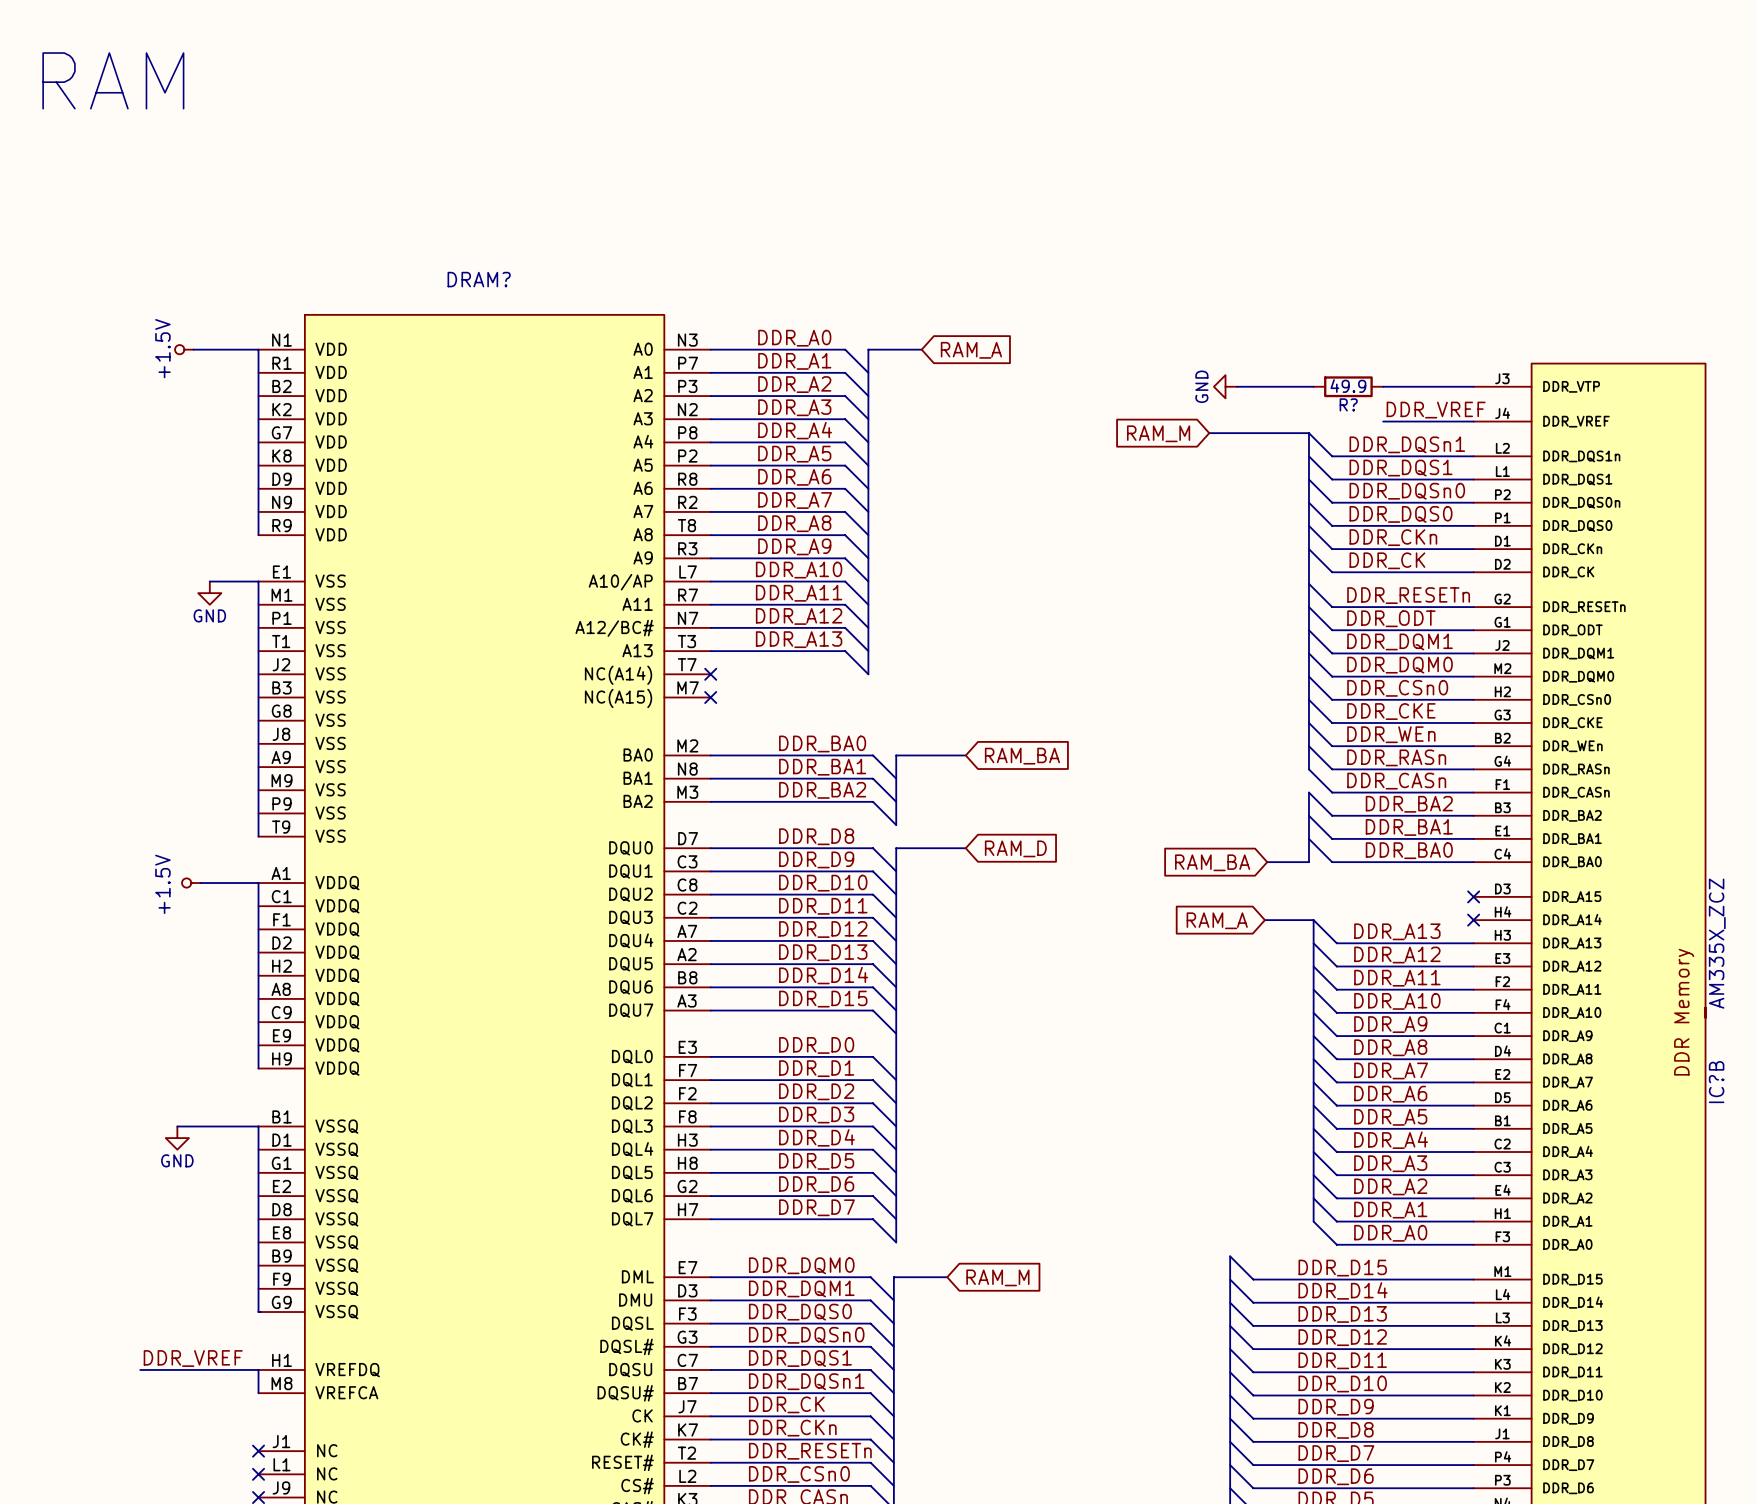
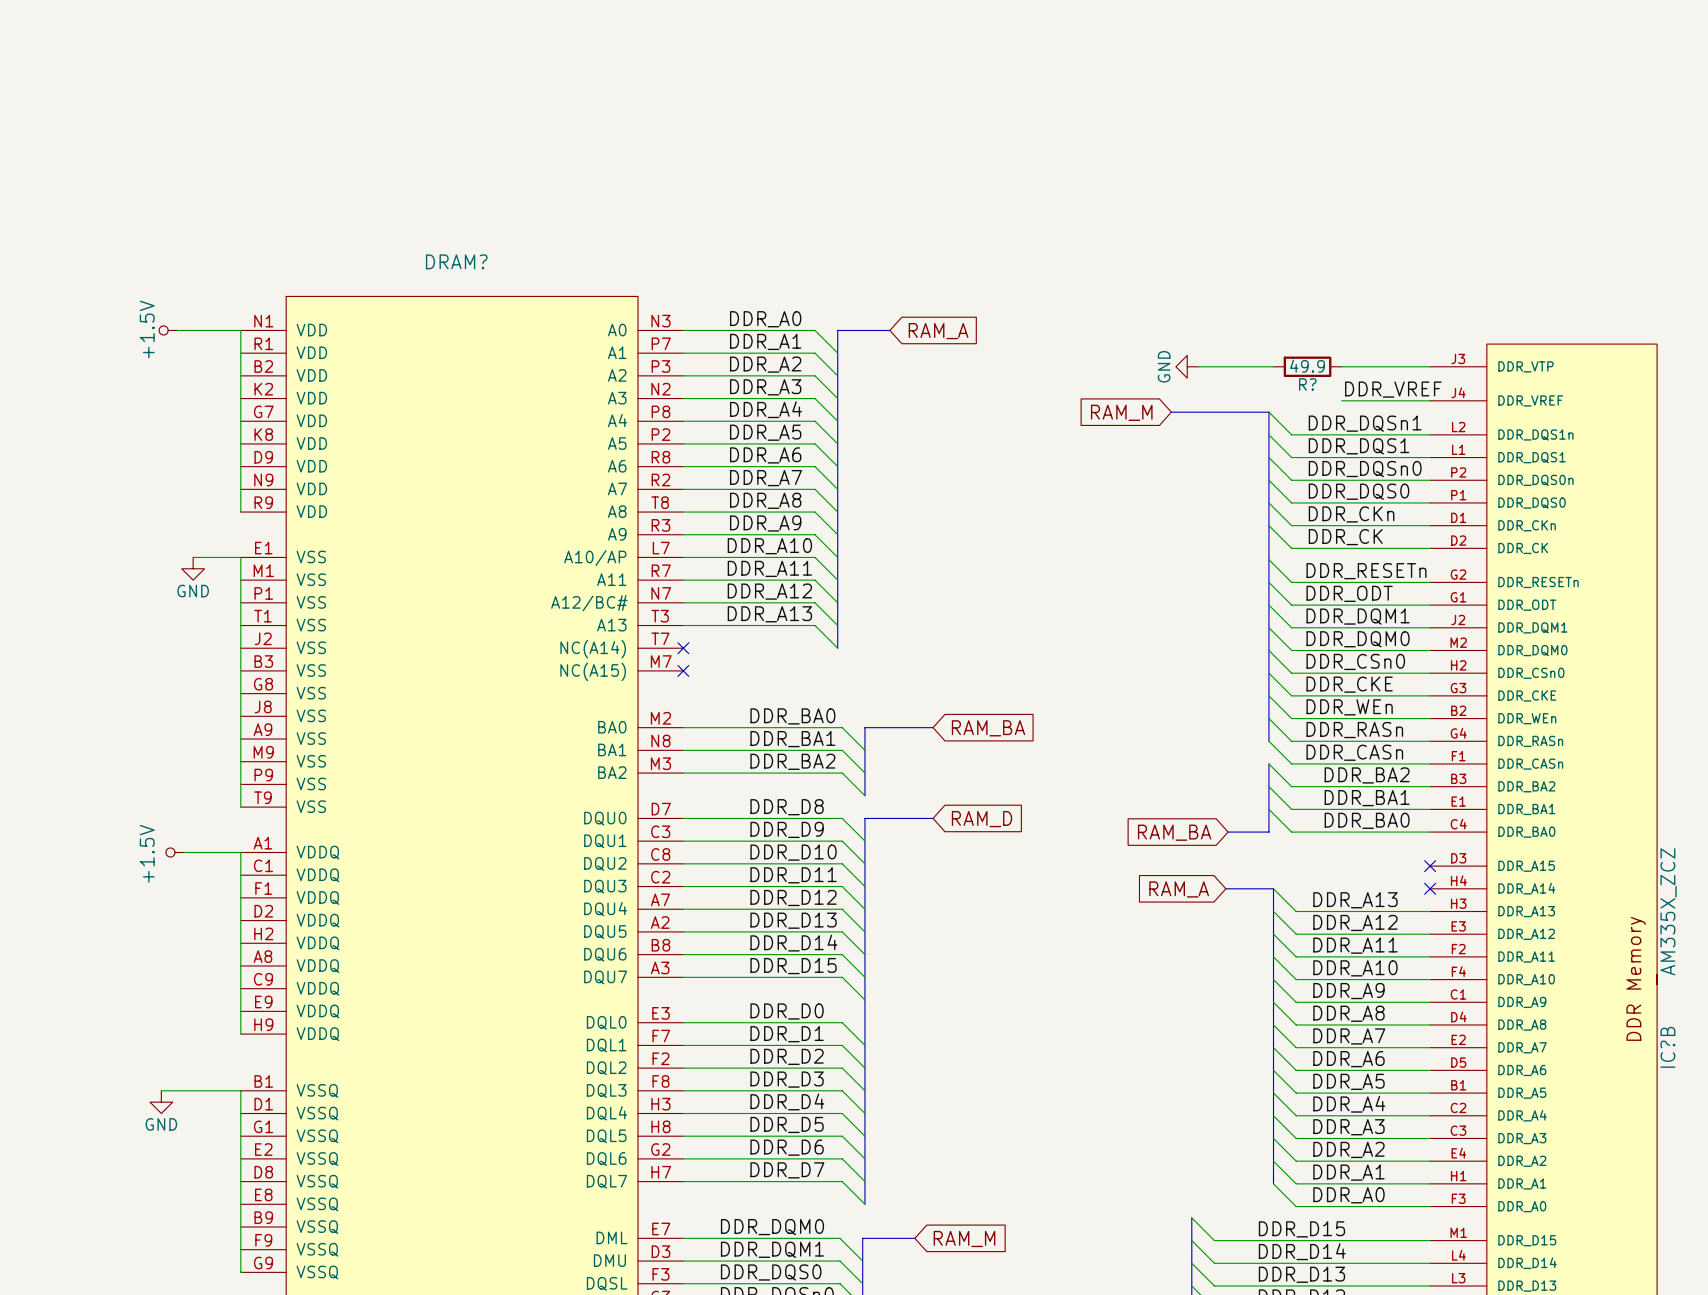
text: RAM (113, 80) -> none

